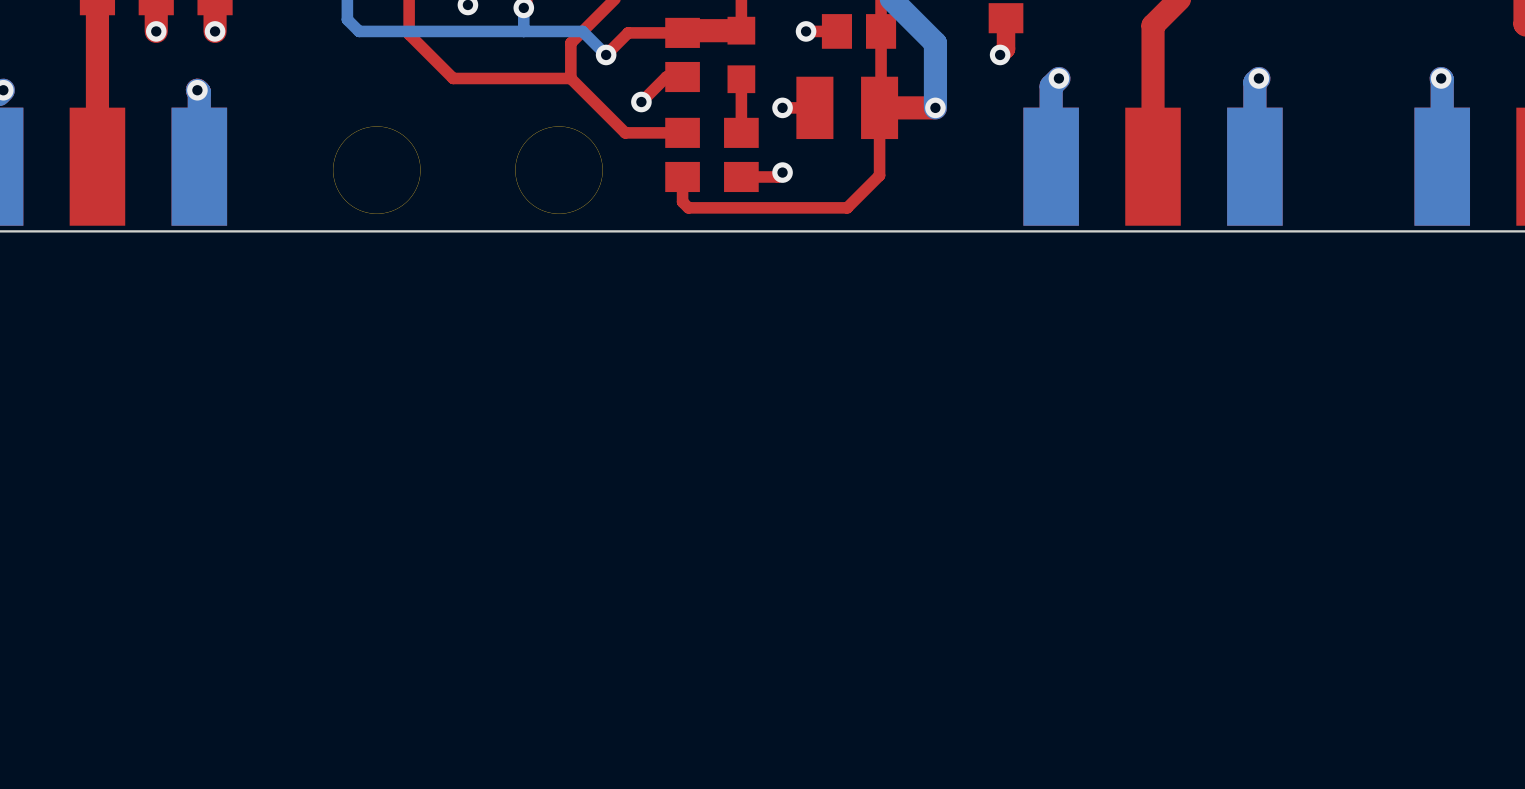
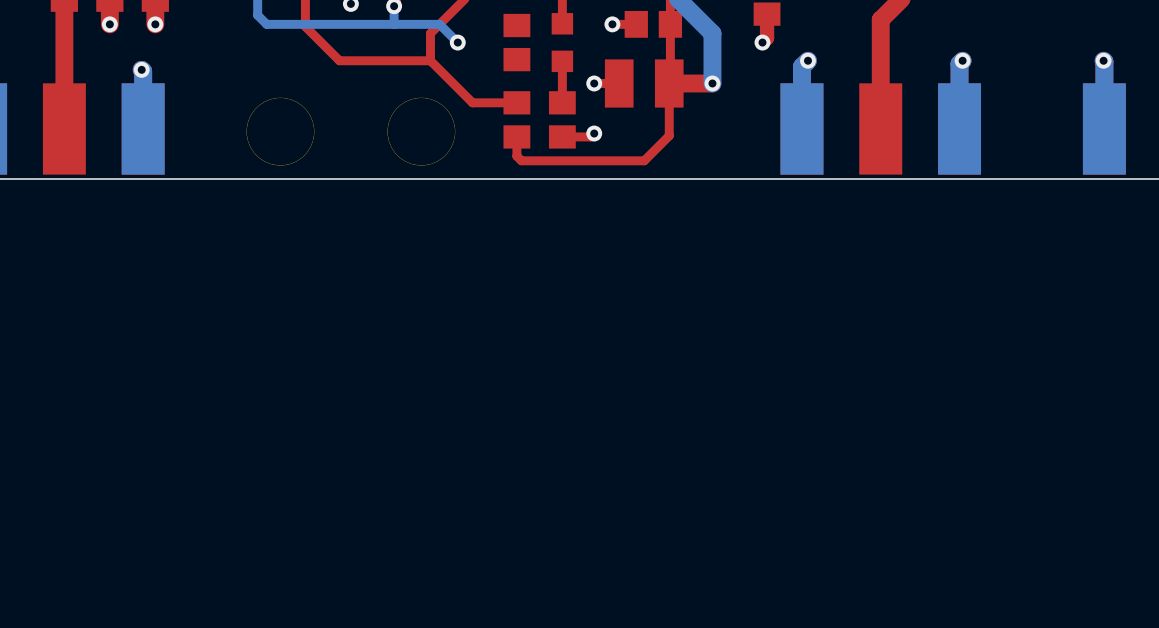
top track: (741, 30) (628, 32) (606, 54) -> none
top track: (682, 77) (666, 77) (641, 102) -> none
via: (641, 102) -> none

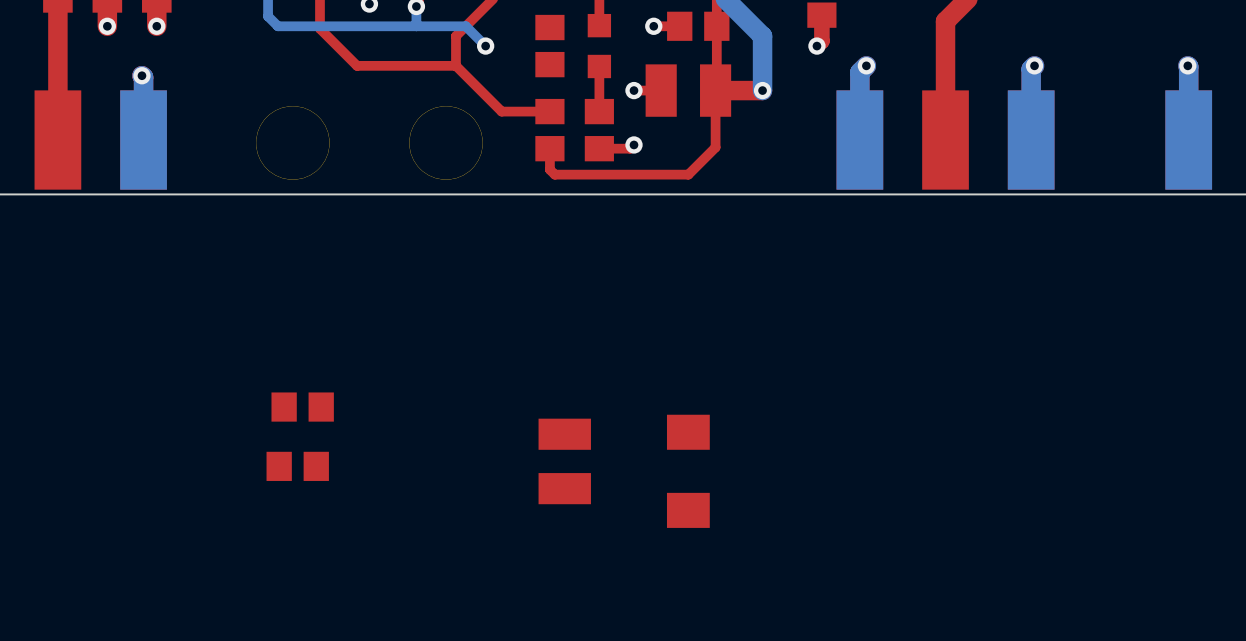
part: none -> (302, 407)
part: none -> (564, 461)
part: none -> (297, 466)
part: none -> (688, 471)

